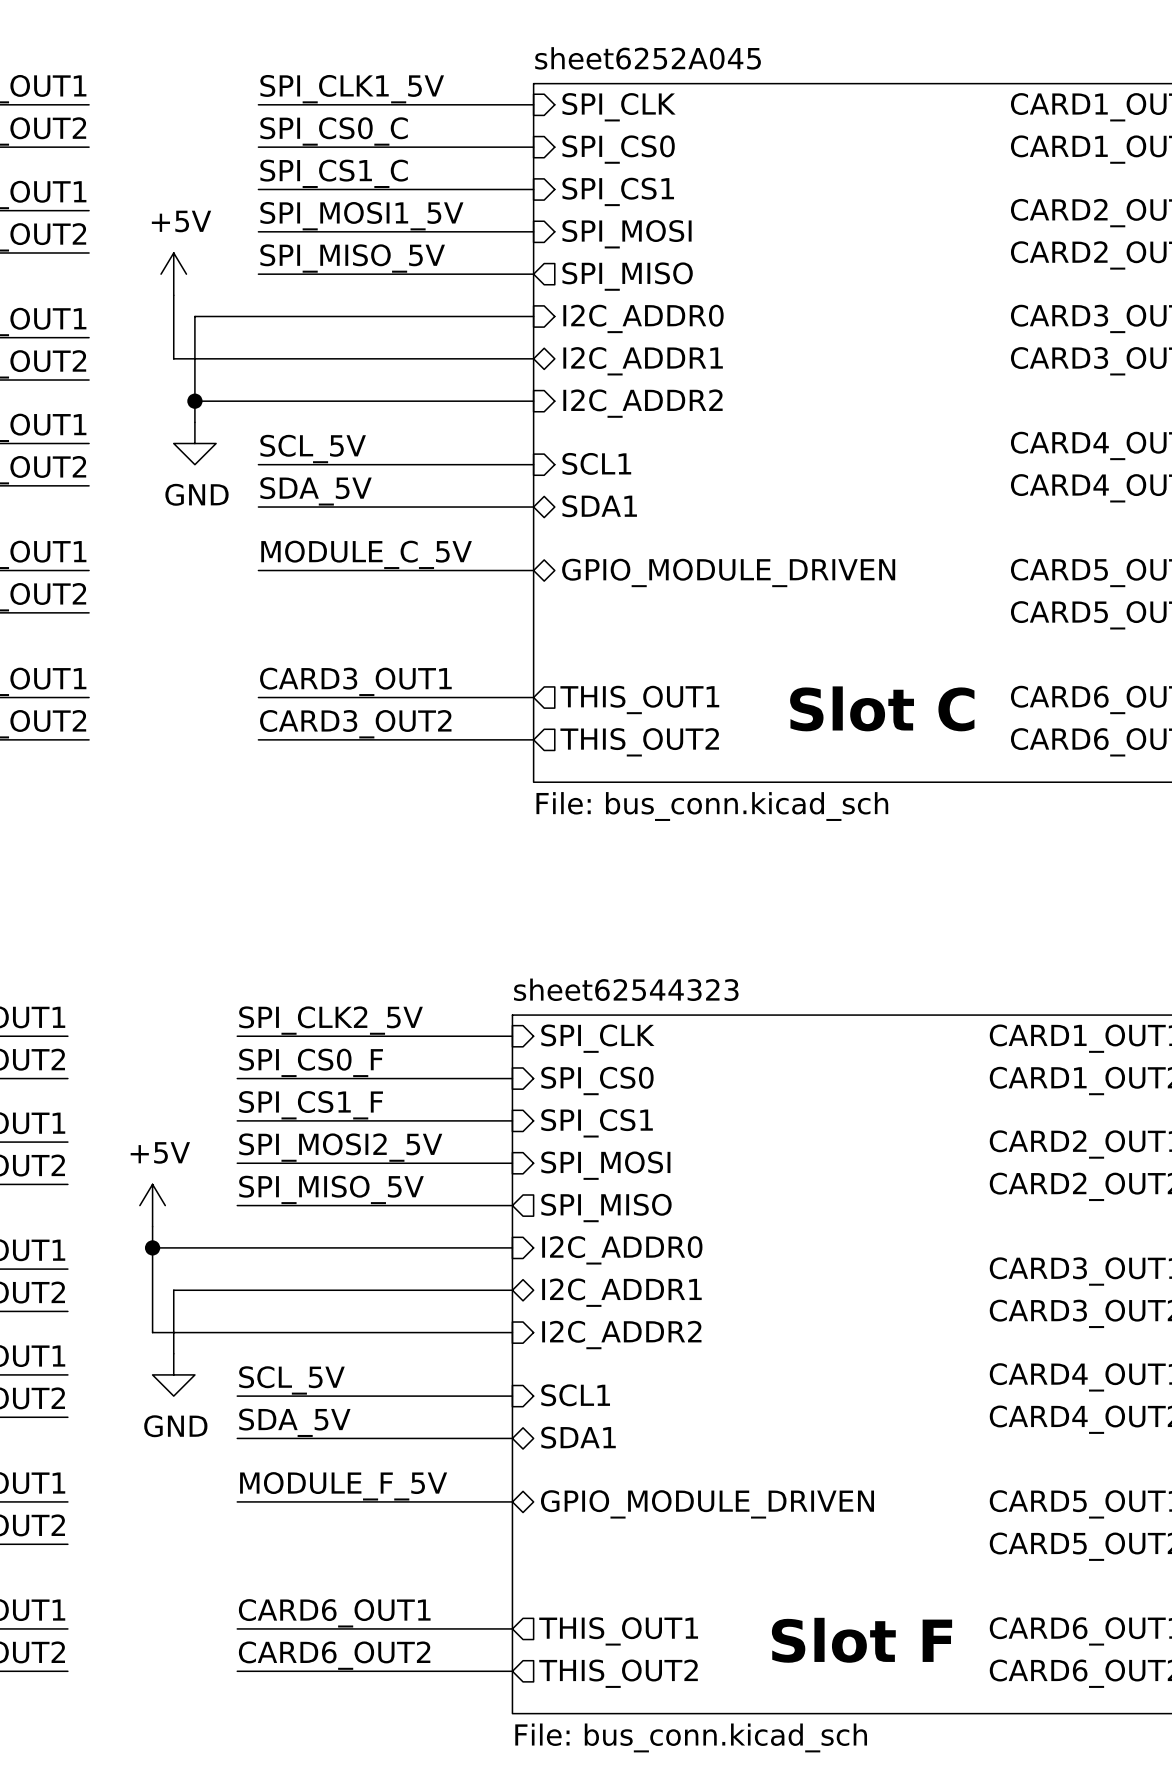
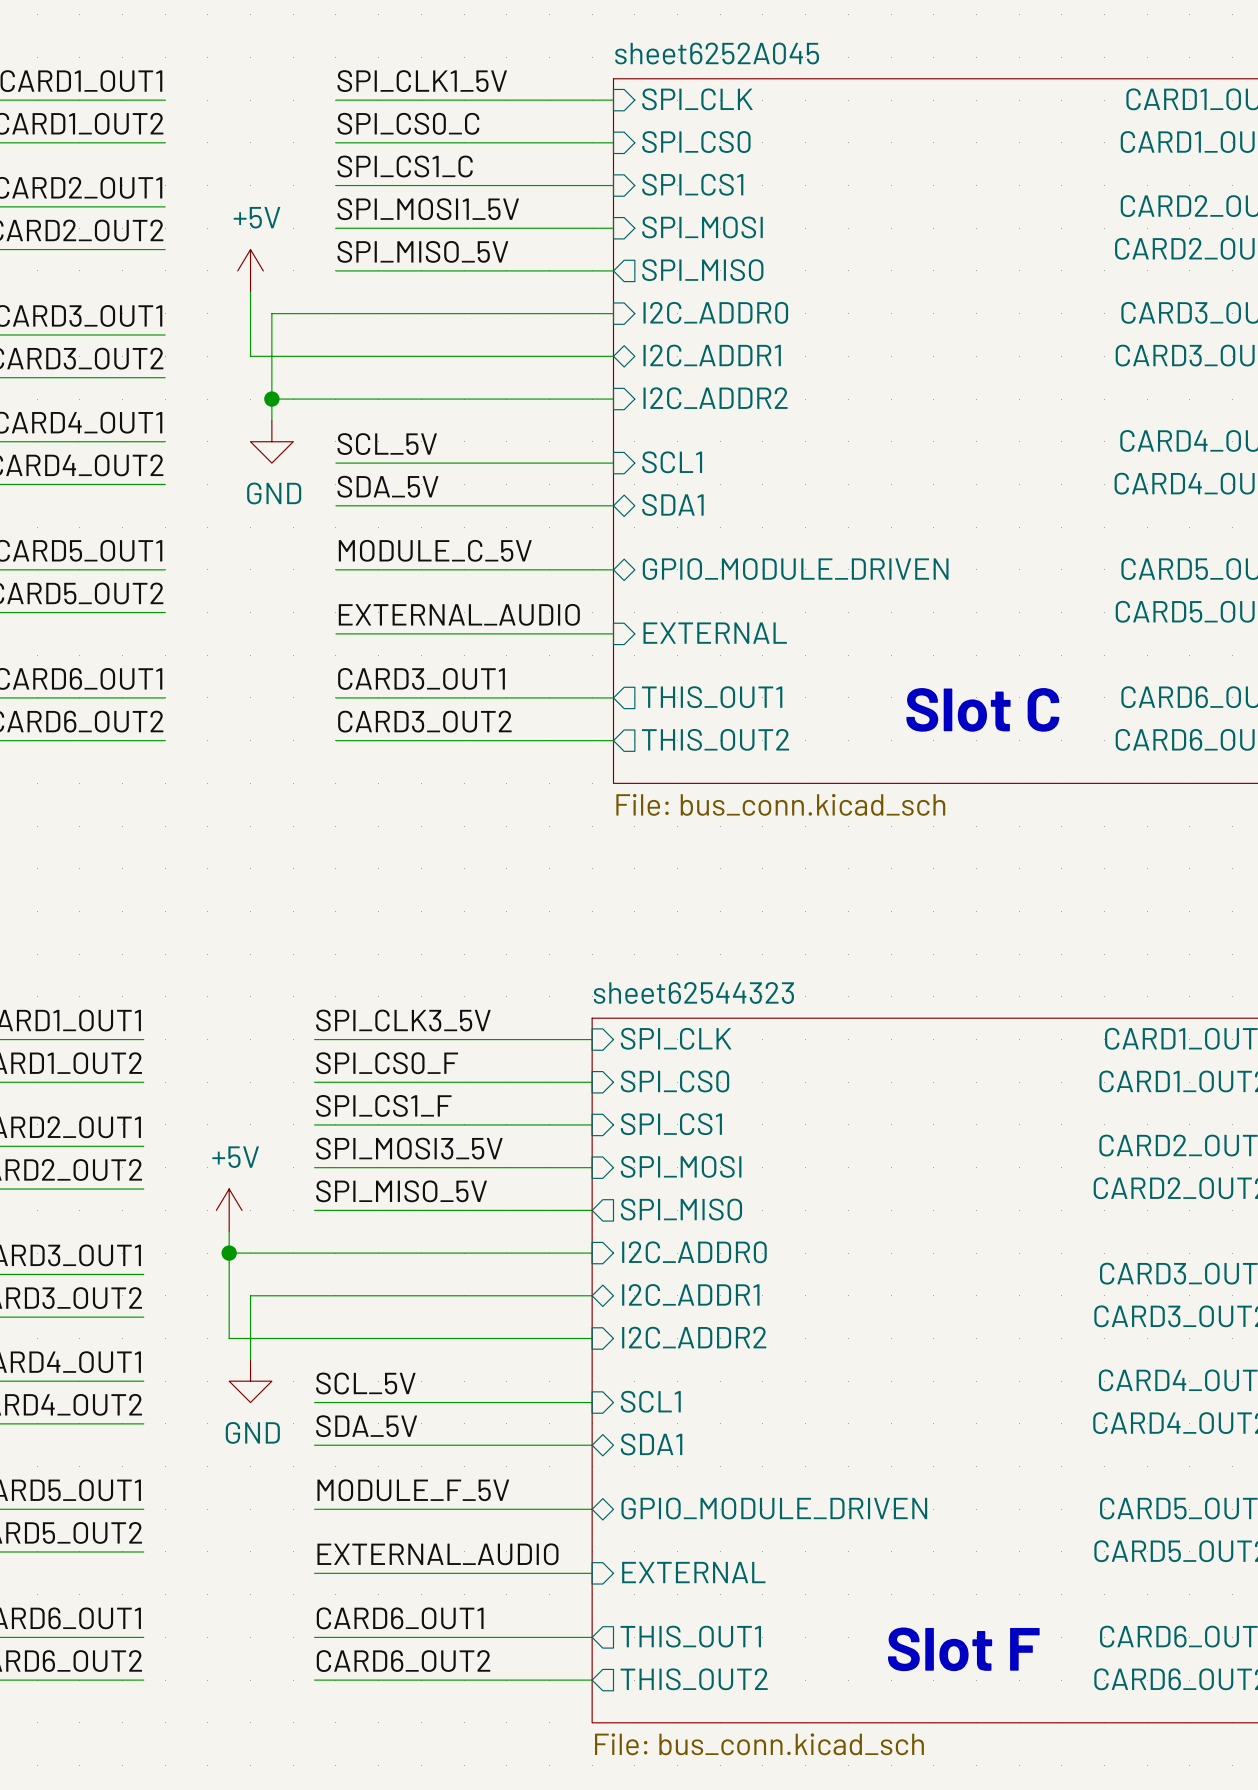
label: none -> EXTERNAL_AUDIO (459, 614)
sheet pin: none -> EXTERNAL (715, 633)
wire: none -> (335, 633) (613, 633)
label: SPI_CLK2_5V (331, 1020) -> SPI_CLK3_5V (403, 1020)
label: SPI_MOSI2_5V (340, 1147) -> SPI_MOSI3_5V (409, 1148)
label: none -> EXTERNAL_AUDIO (437, 1554)
sheet pin: none -> EXTERNAL (693, 1572)
wire: none -> (314, 1573) (592, 1573)

